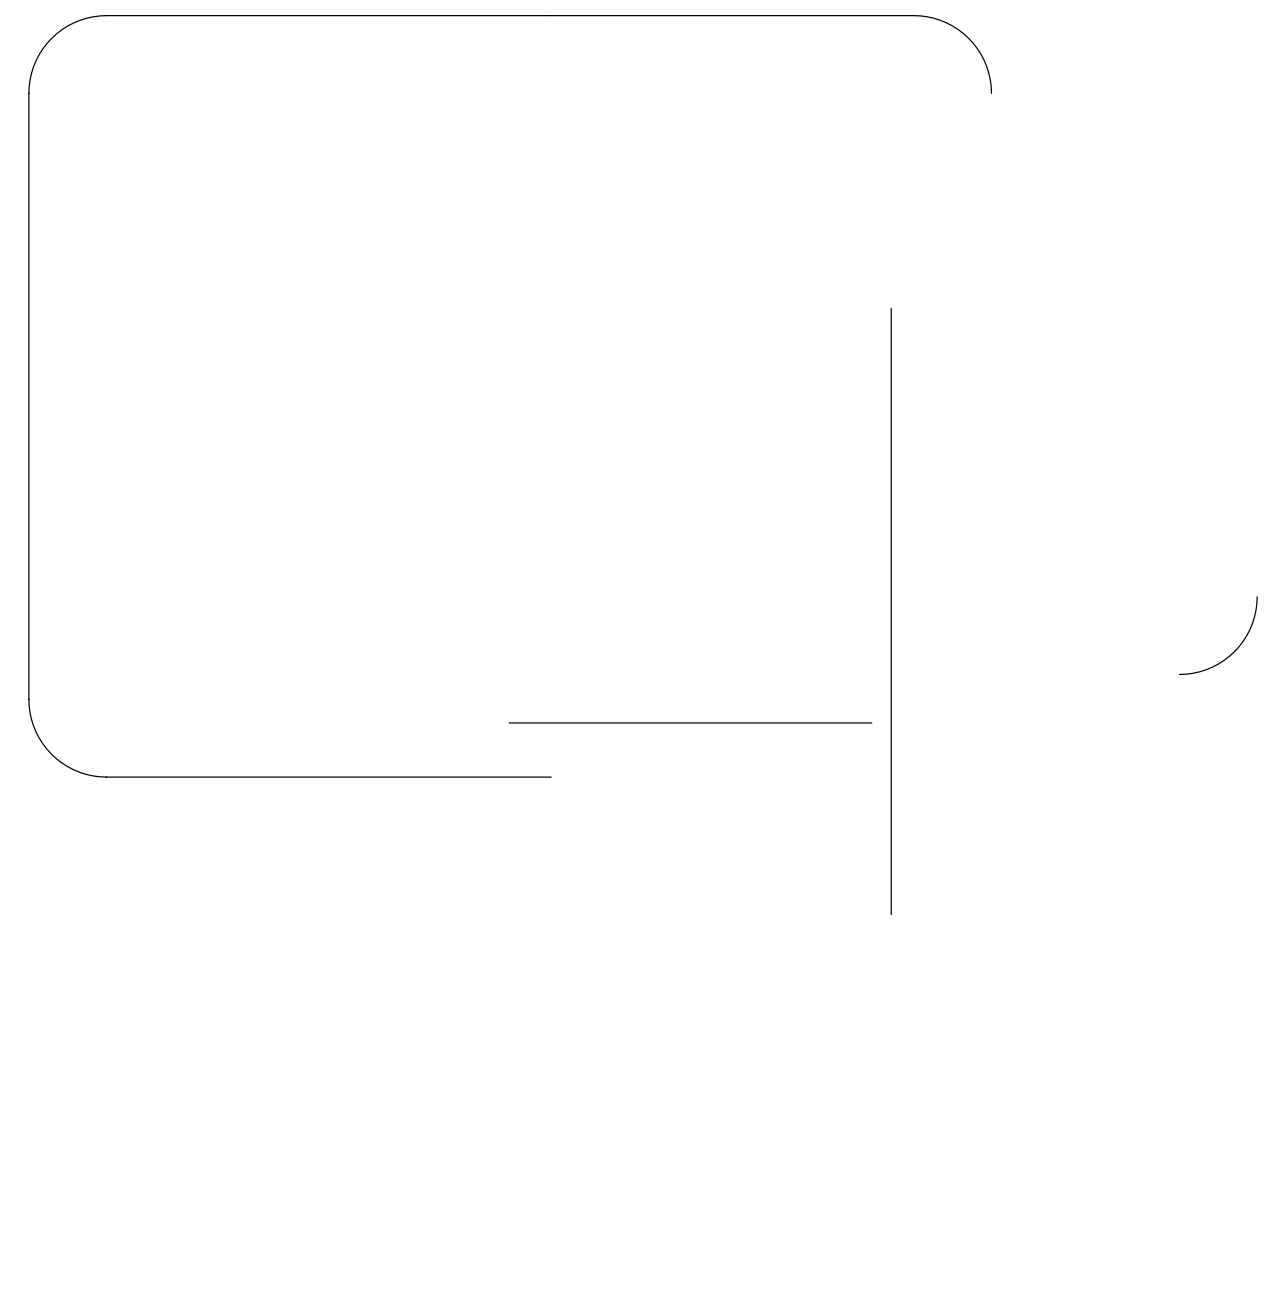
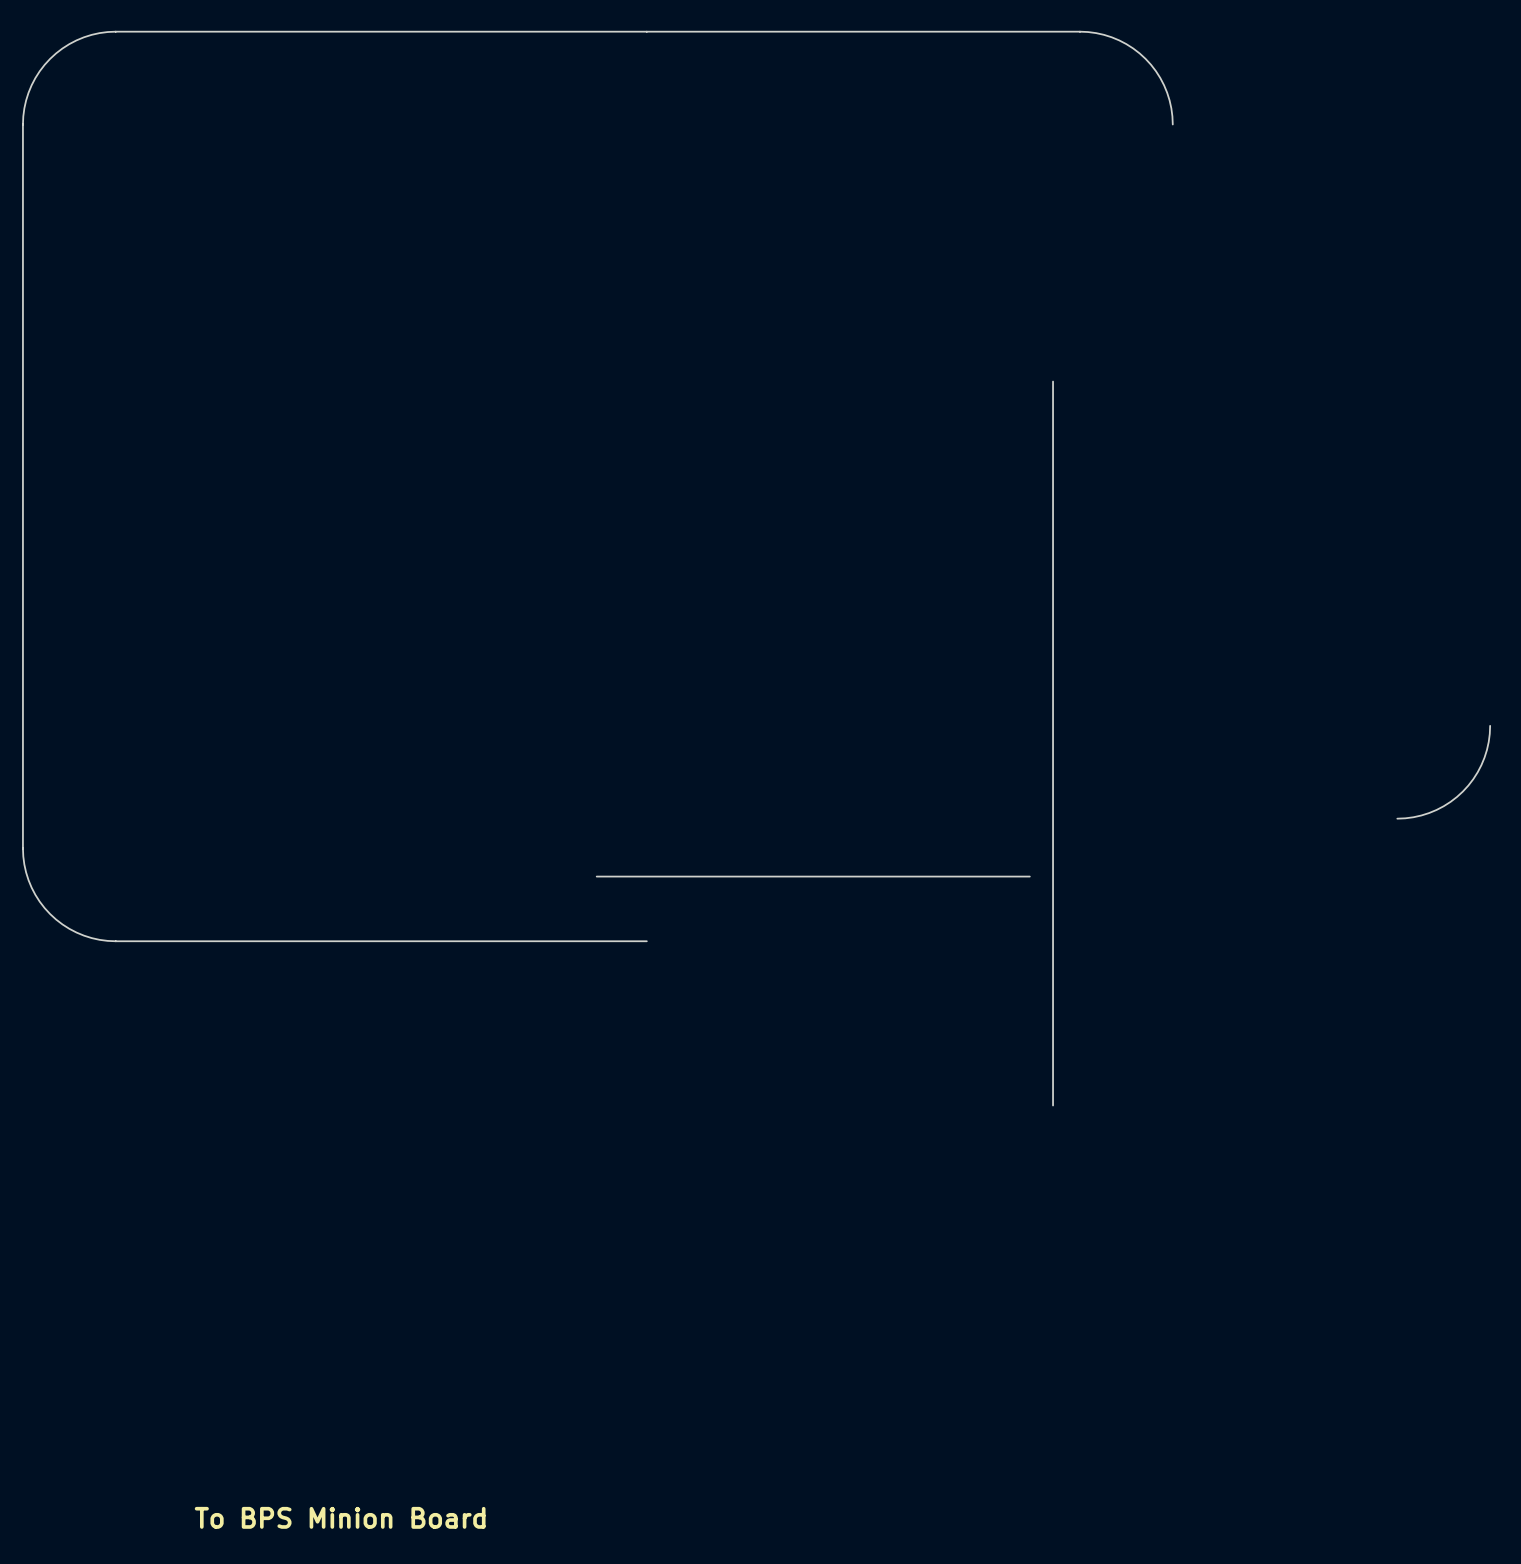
text: none -> To BPS Minion Board (340, 1517)

